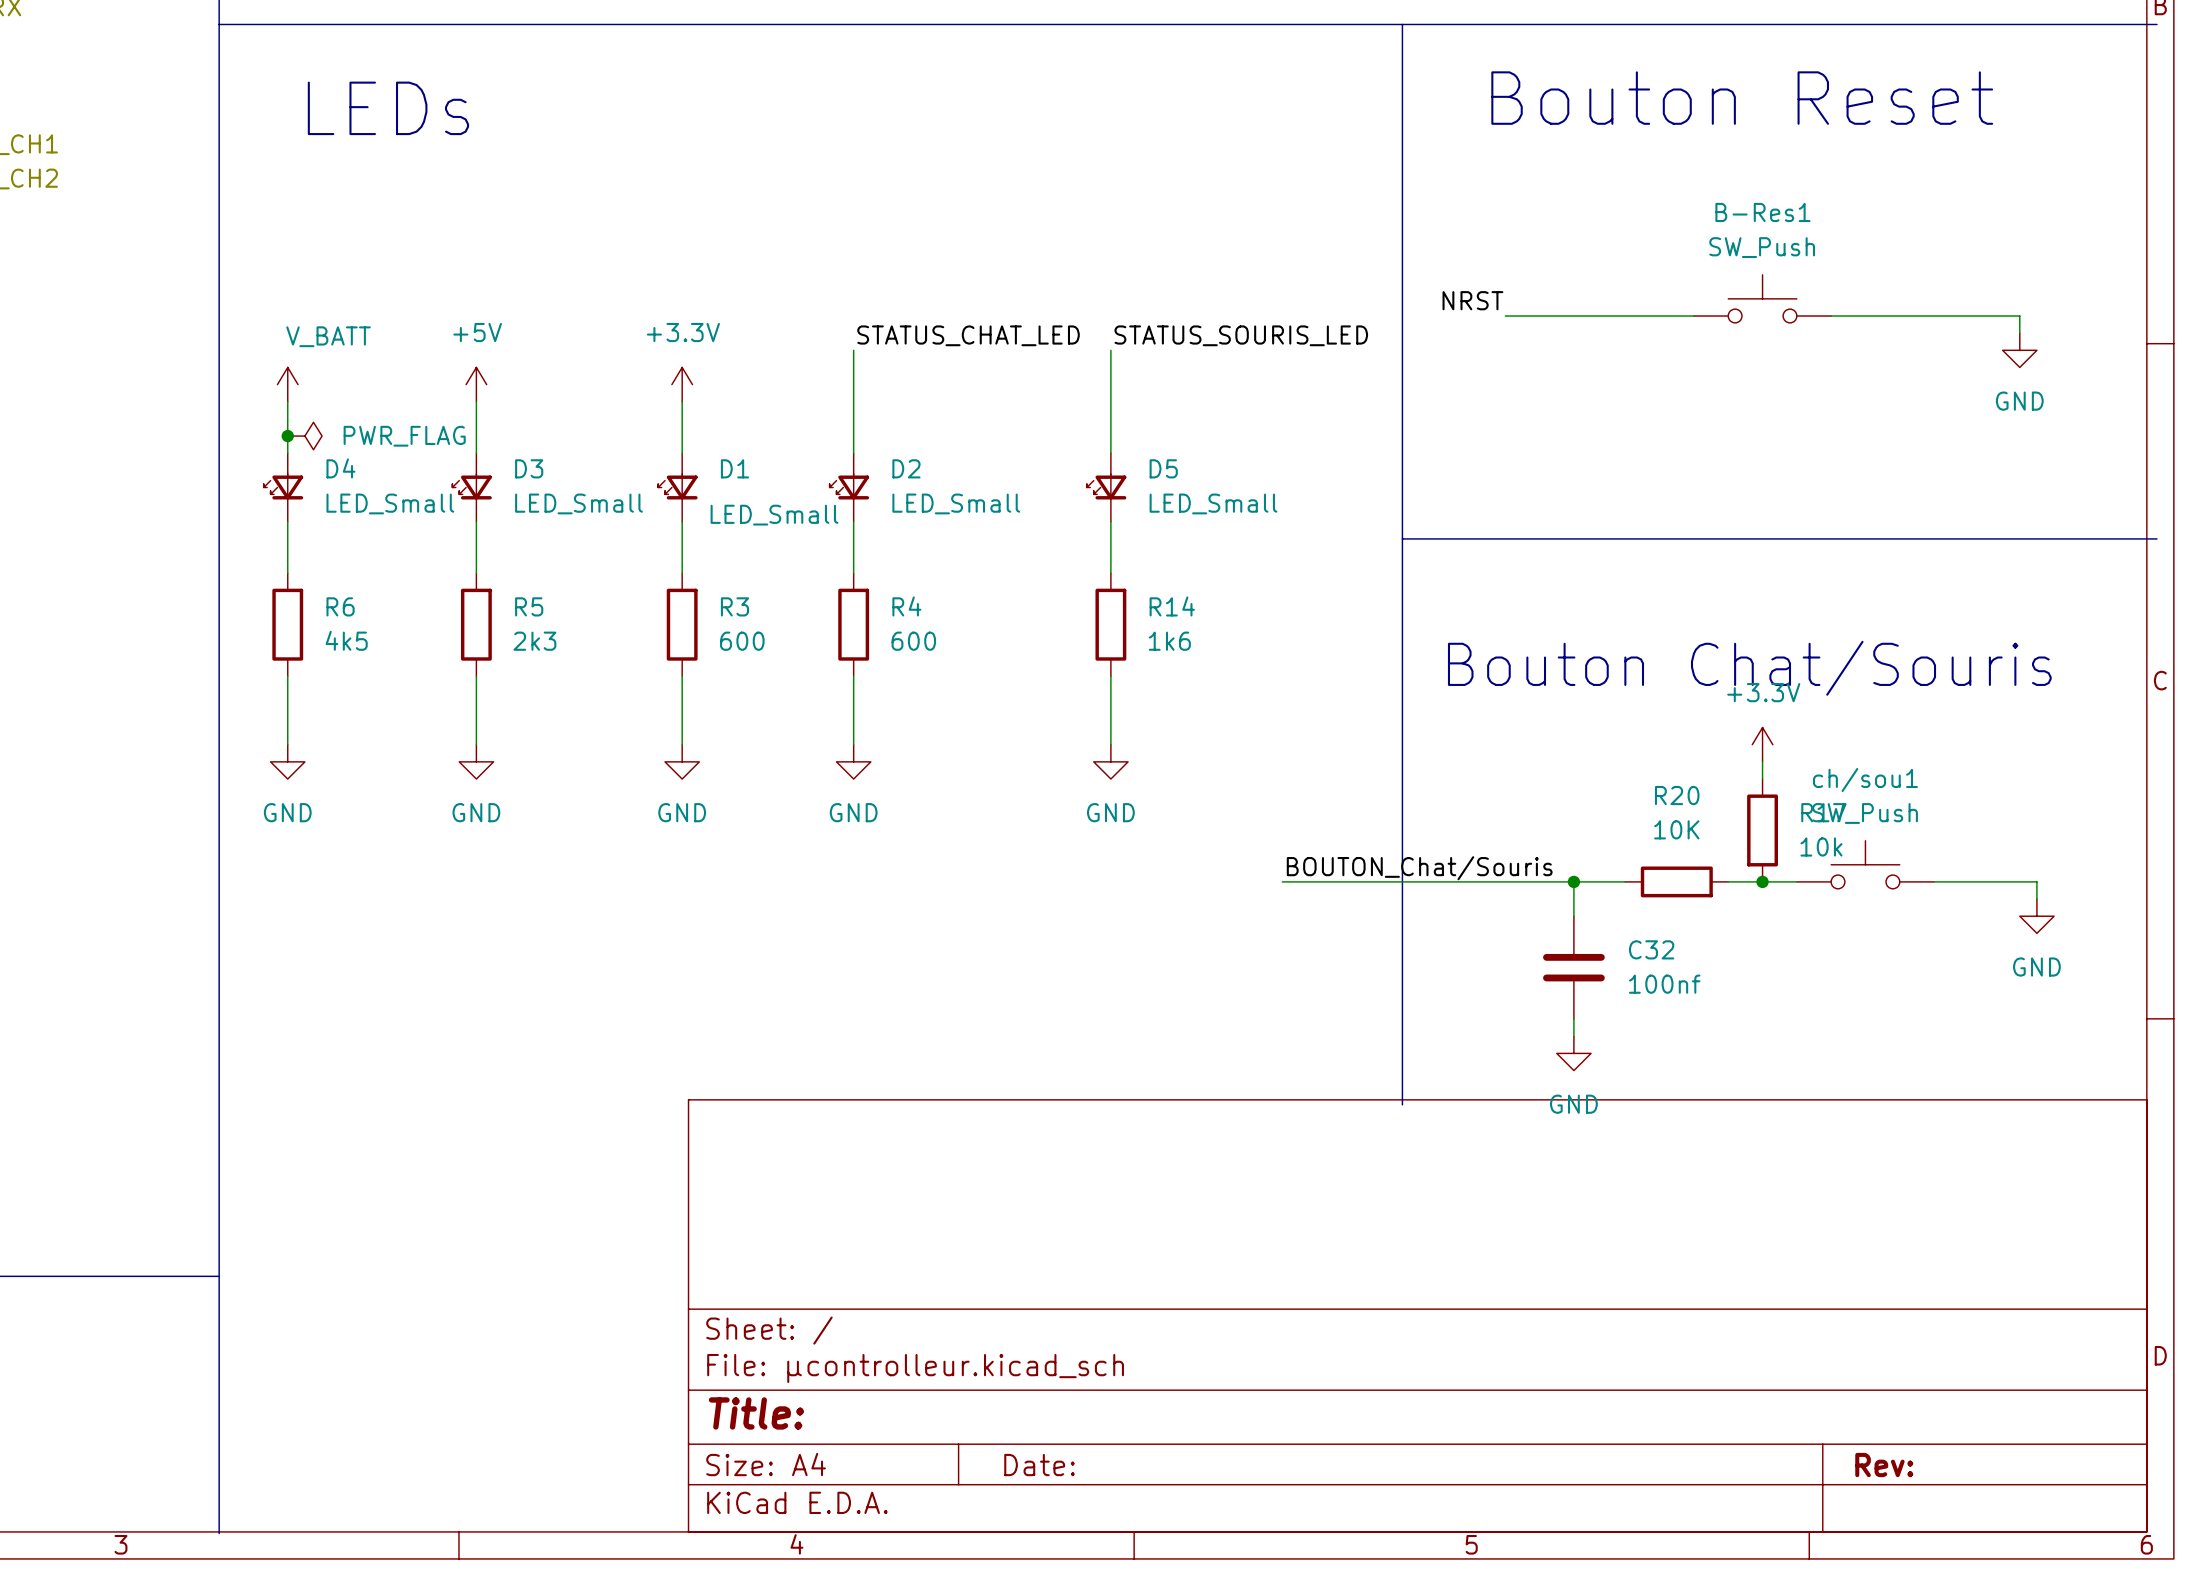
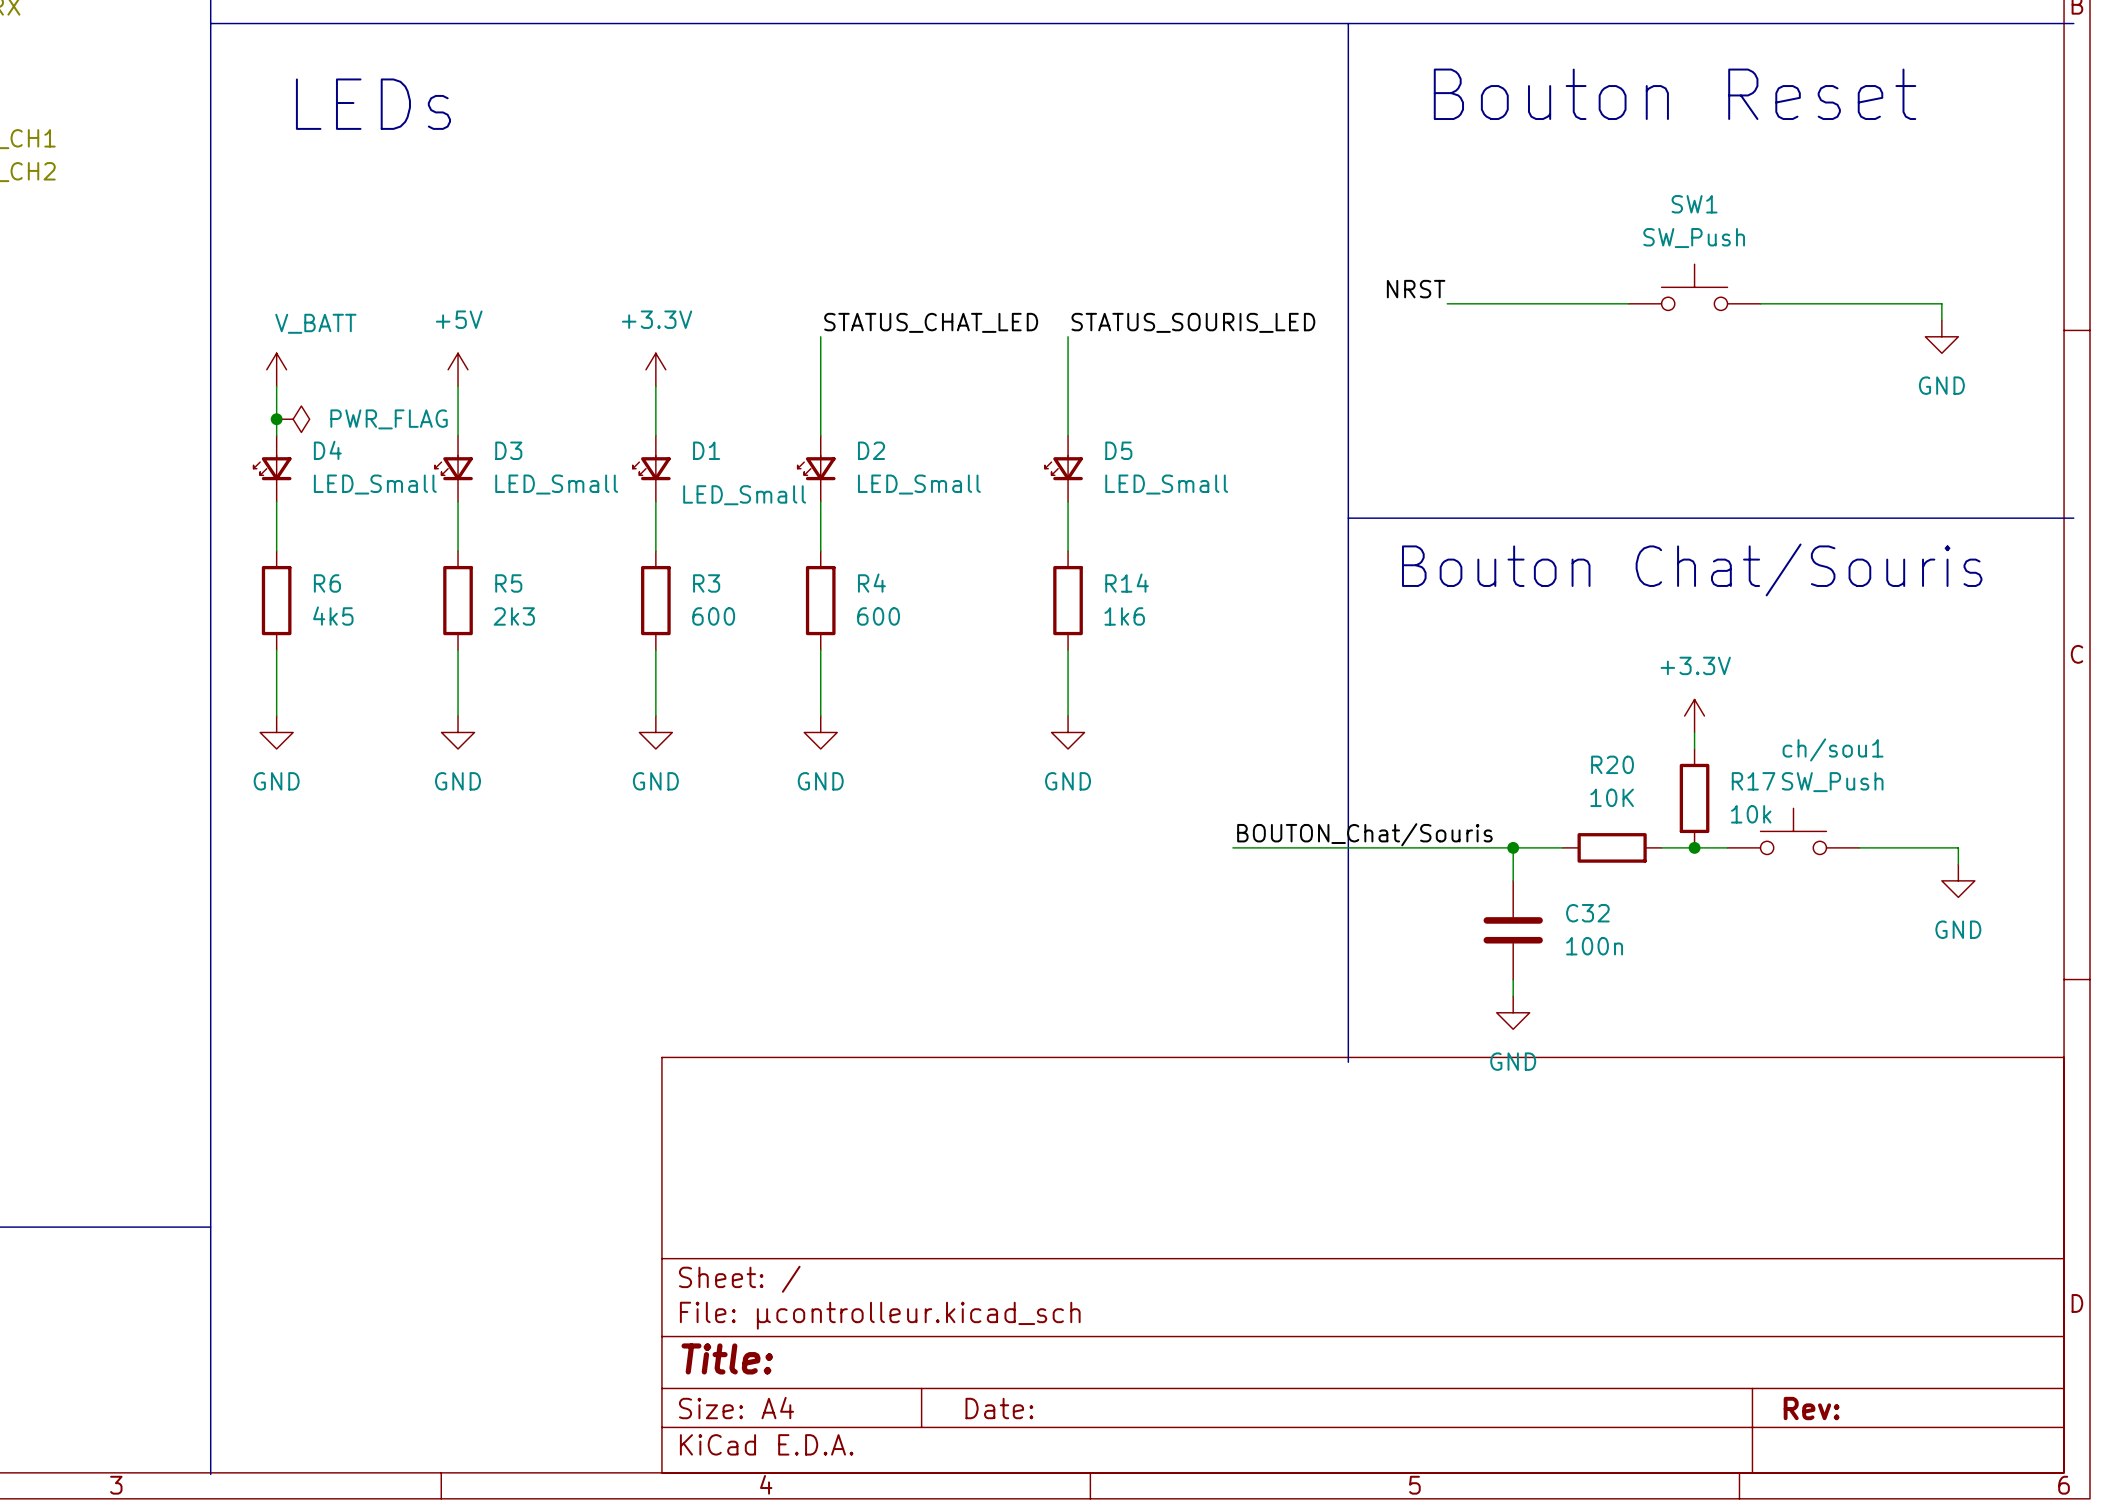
B-Res1 name: B-Res1 (1762, 212) -> SW1 (1694, 204)
text position: Bouton Chat/Souris (1749, 668) -> Bouton Chat/Souris (1692, 569)
ch/sou1 name position: ch/sou1 (1865, 780) -> ch/sou1 (1833, 749)
ch/sou1 value position: SW_Push (1865, 813) -> SW_Push (1832, 782)
C32 value: 100nf (1664, 984) -> 100n (1594, 946)

